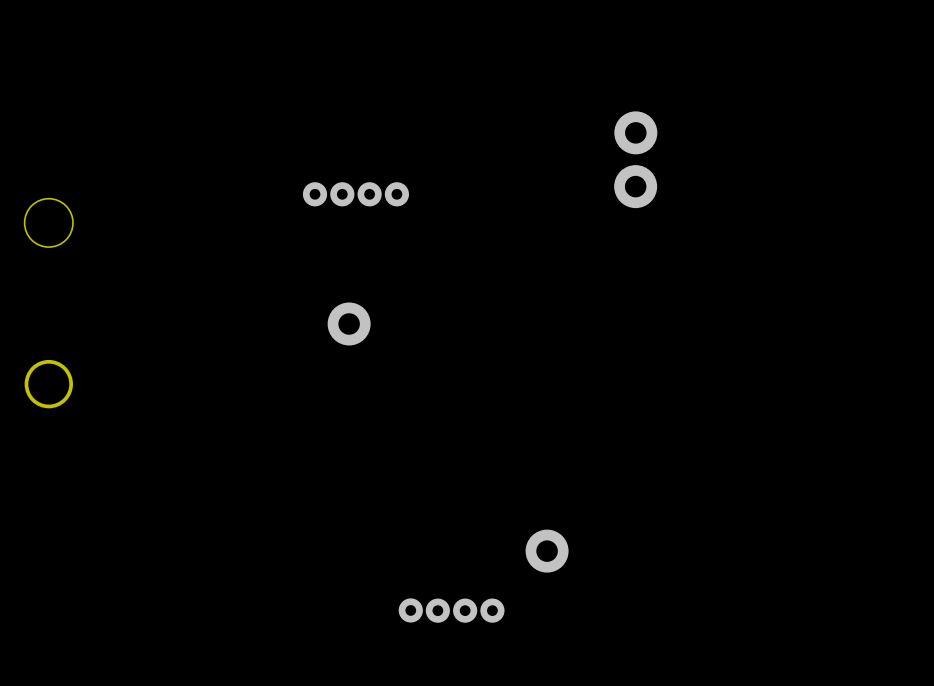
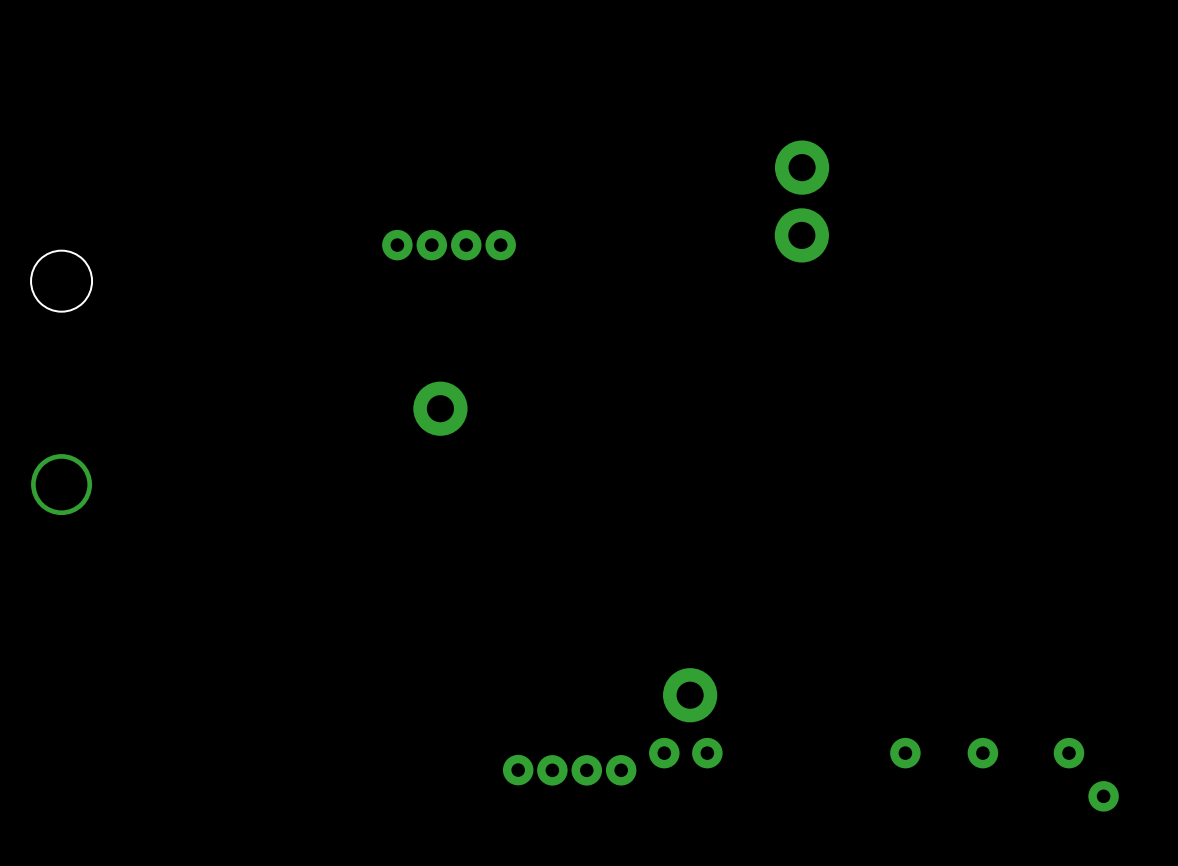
via: none -> (664, 753)
via: none -> (707, 753)
via: none -> (905, 753)
via: none -> (982, 753)
via: none -> (1069, 753)
via: none -> (1103, 796)

